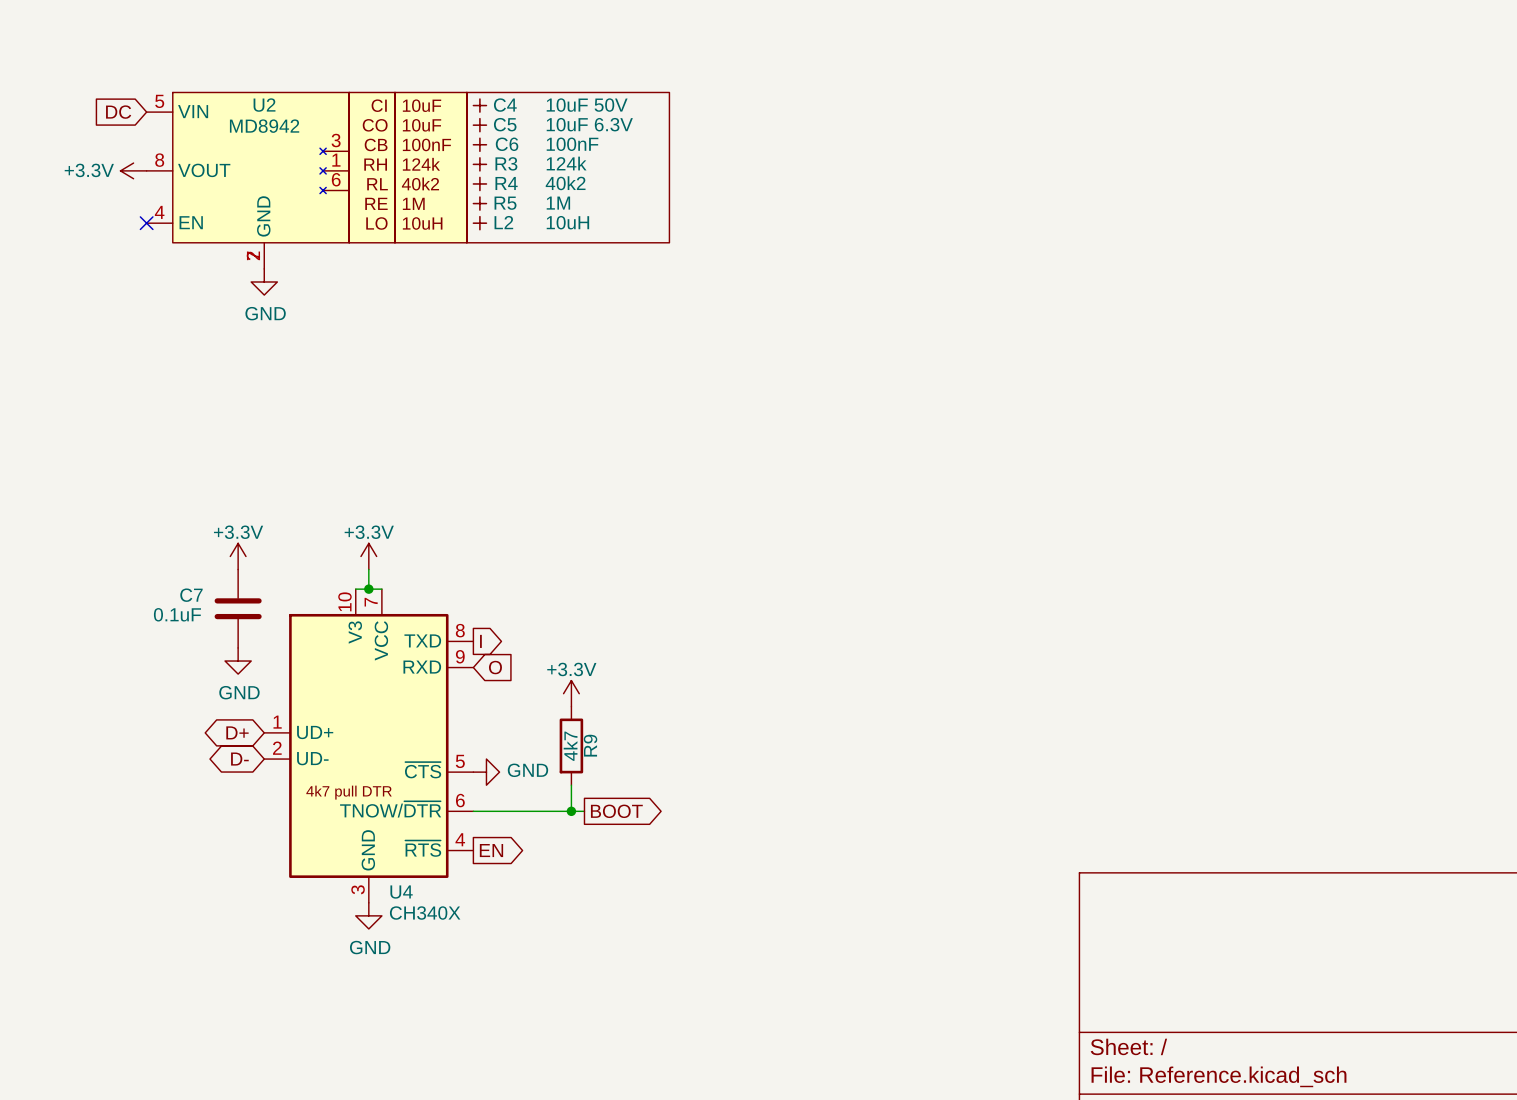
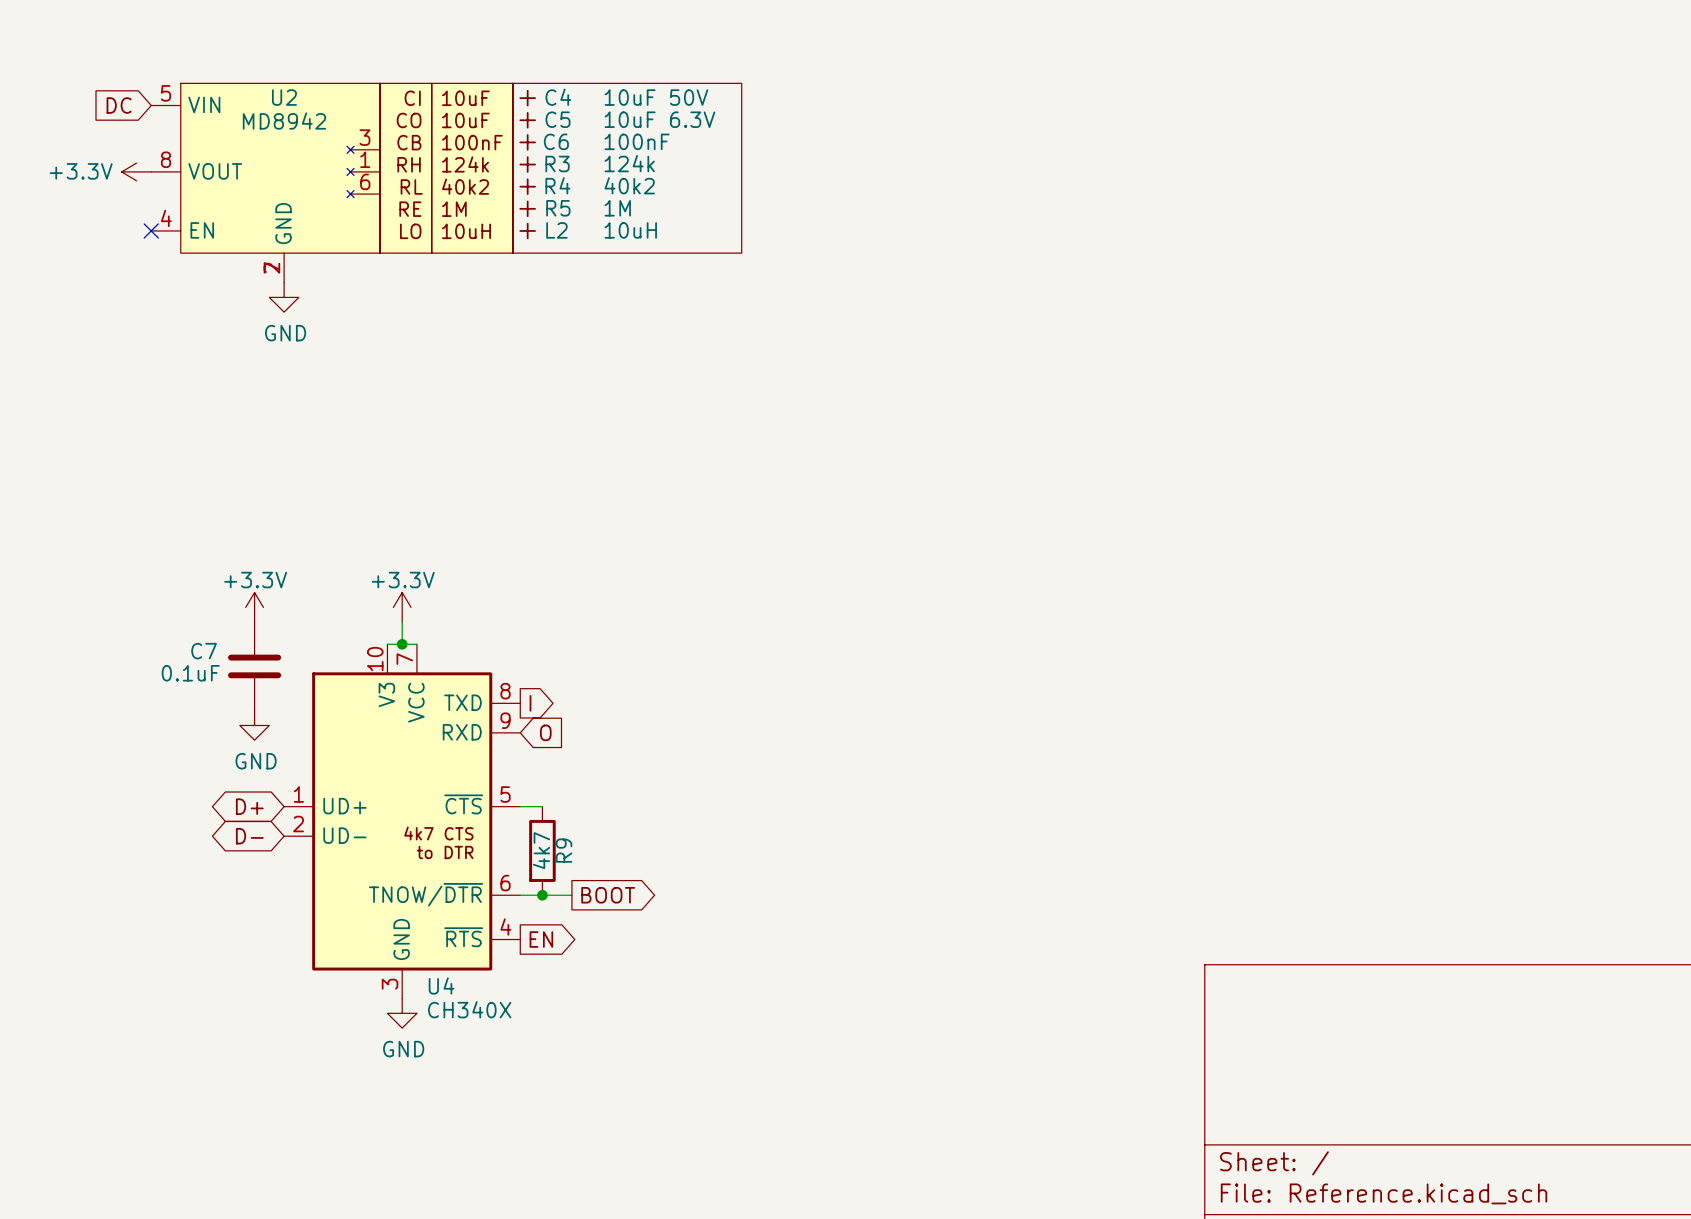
U4 symbol: [264, 589, 474, 903] -> [284, 644, 521, 999]
power symbol: +3.3V (571, 693) -> none
wire: none -> (520, 806) (542, 806)
R9 position: (571, 745) -> (542, 850)
power symbol: GND (486, 772) -> none
wire: (571, 785) (571, 811) -> none
junction: none -> (542, 895)
wire: (519, 811) (584, 811) -> none
junction: (571, 811) -> none
global label position: BOOT (616, 811) -> BOOT (608, 895)

